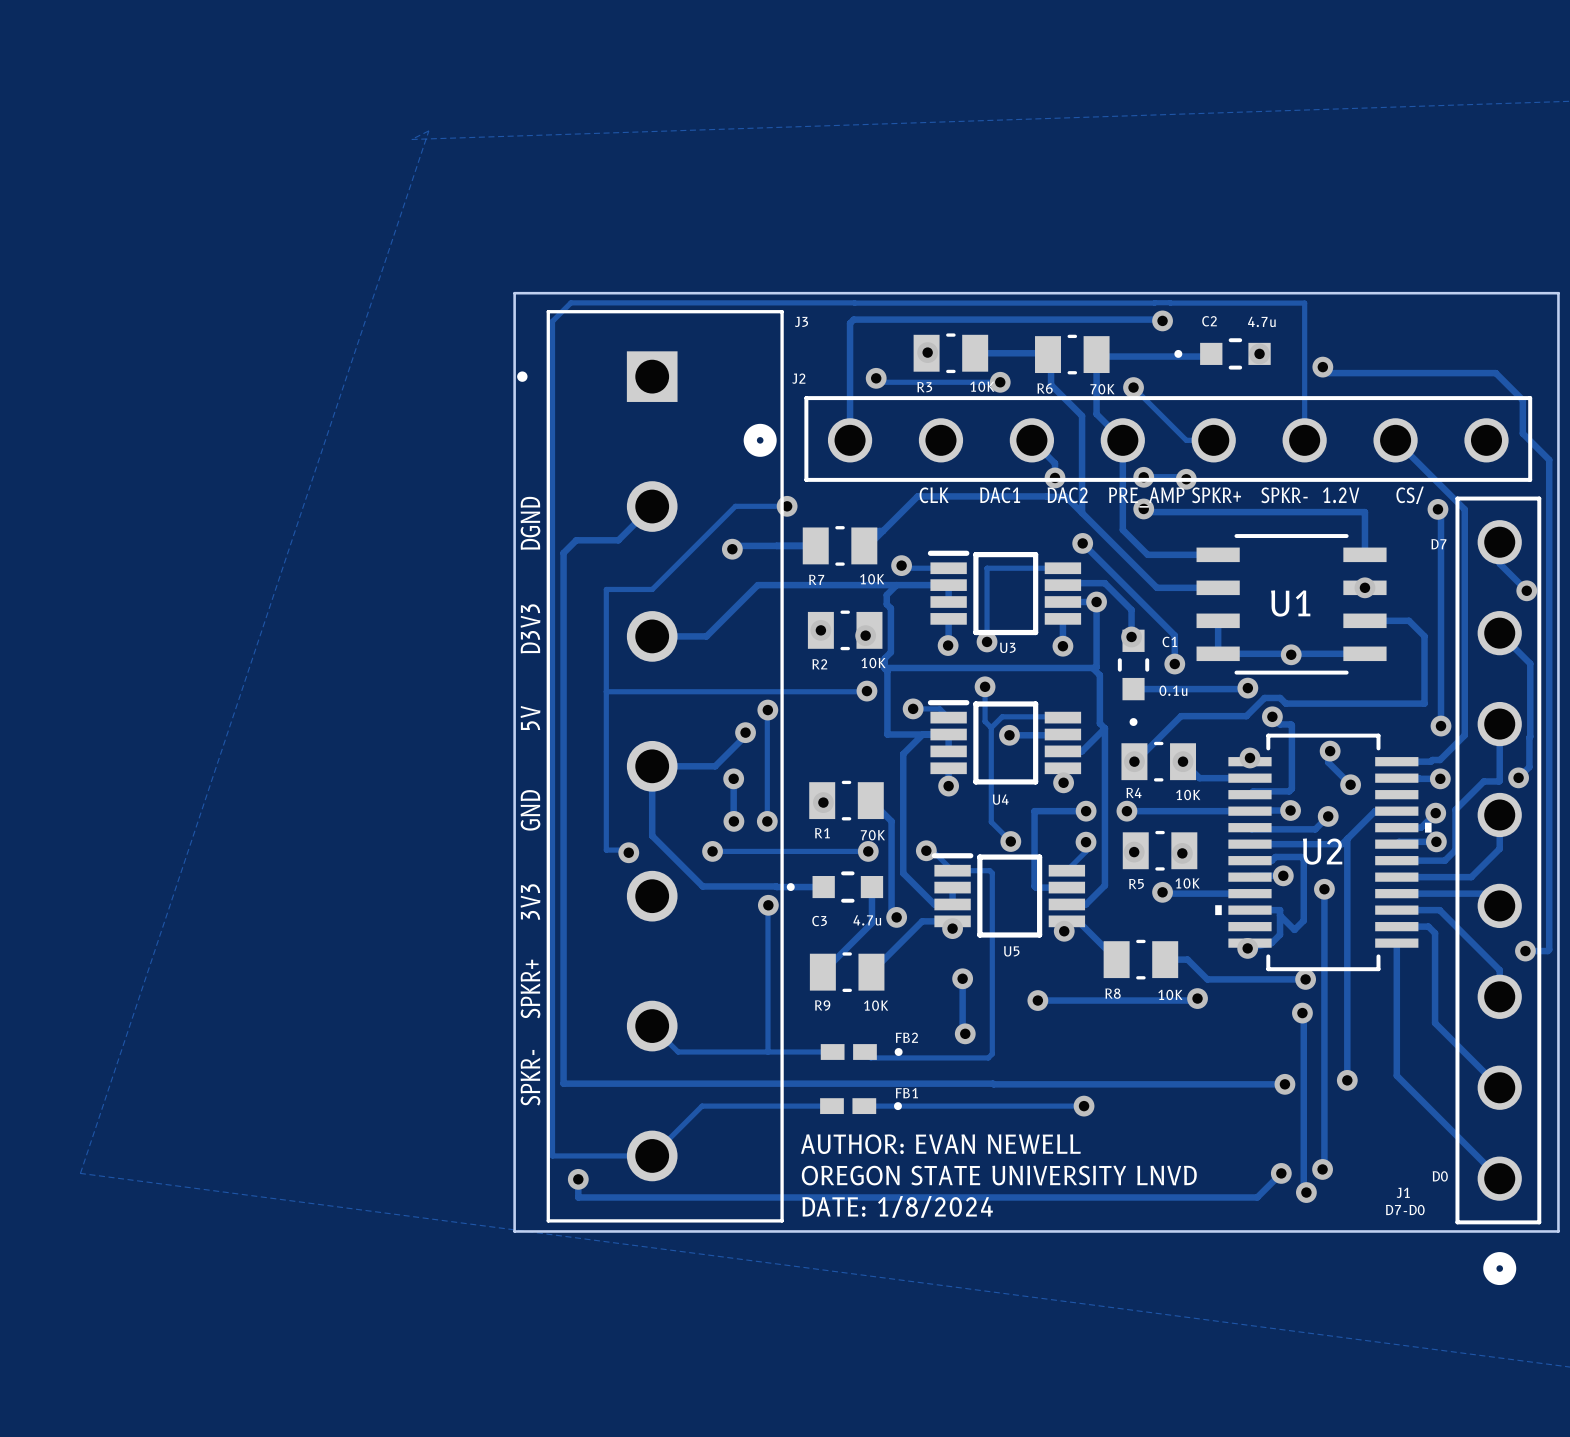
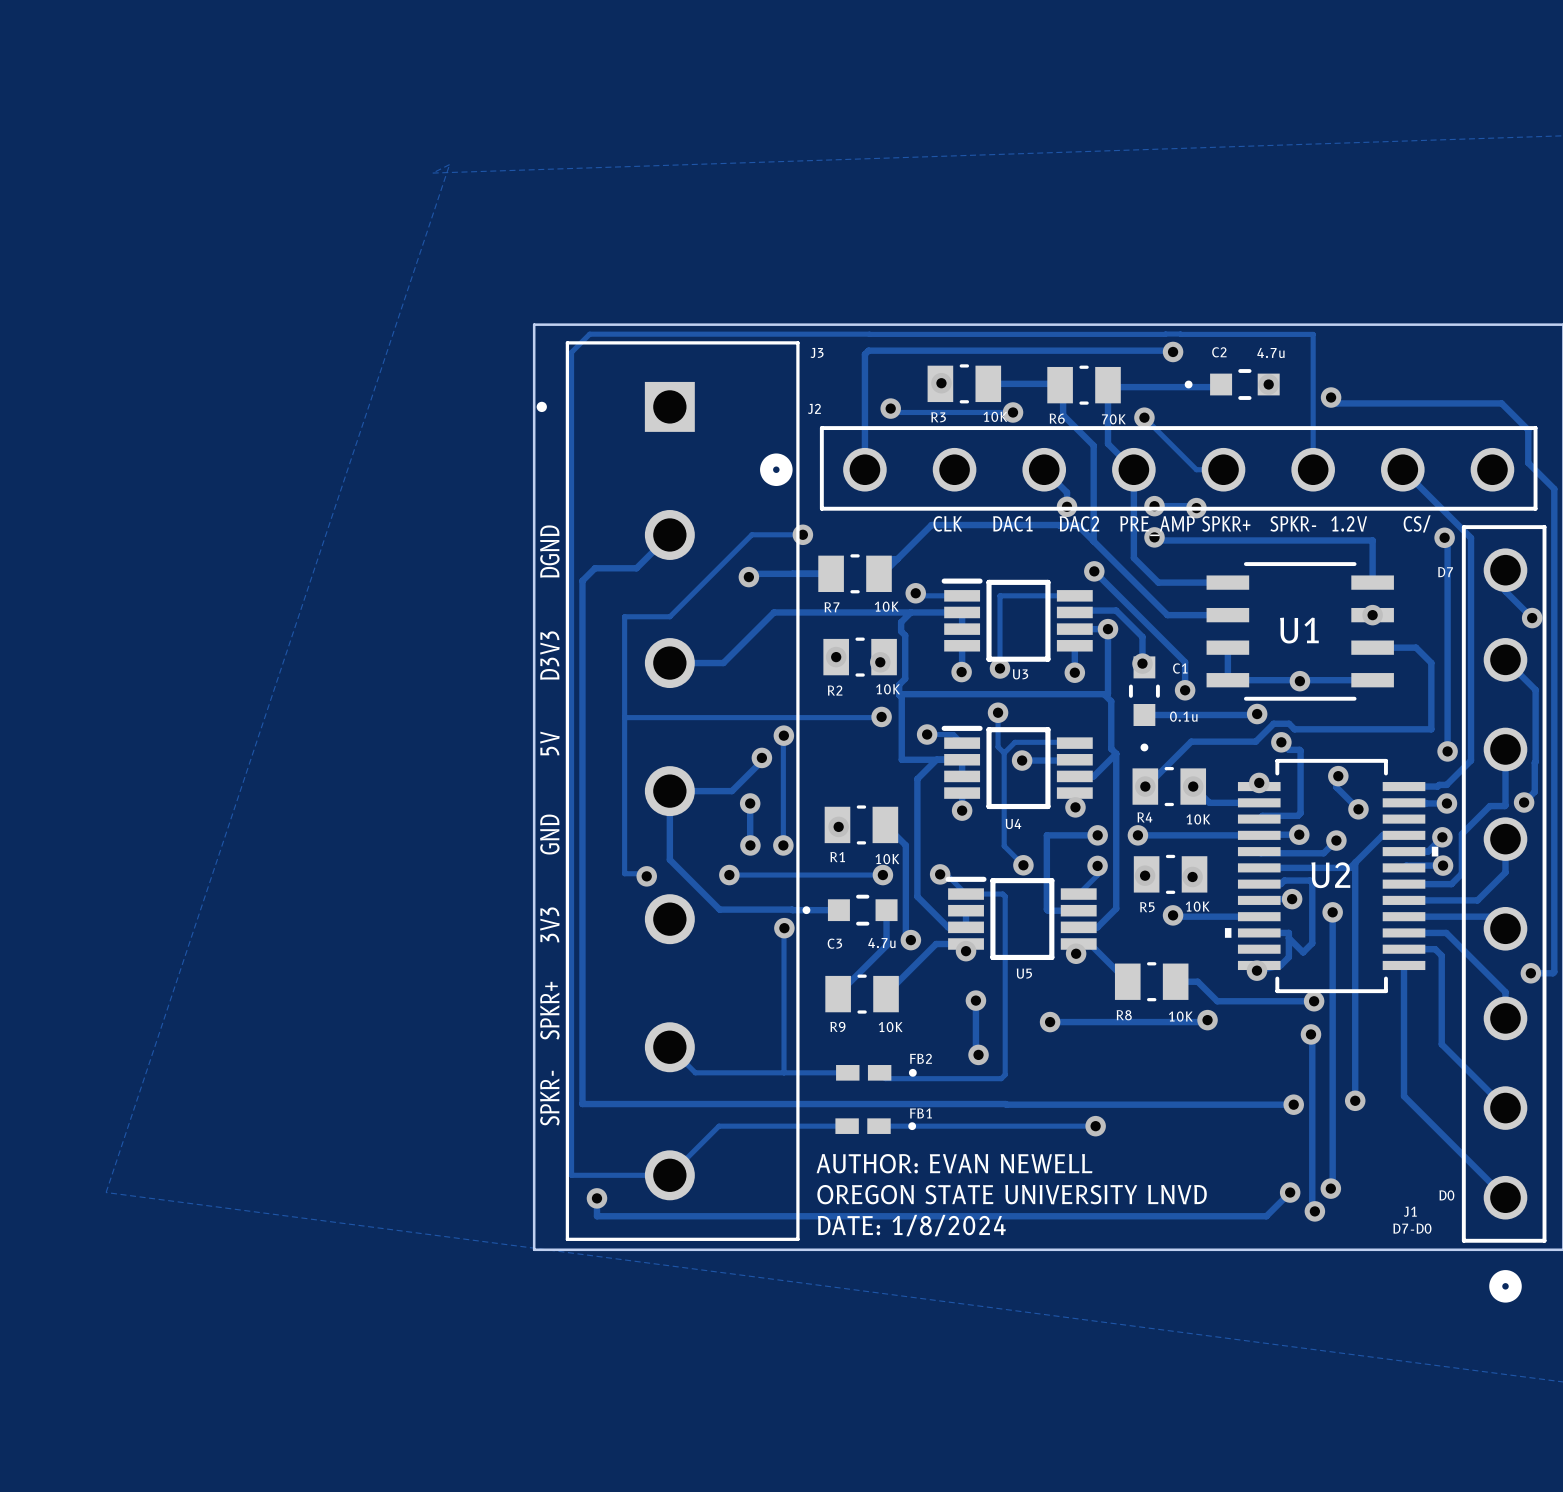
R1 value: 70K (872, 835) -> 10K (887, 859)

